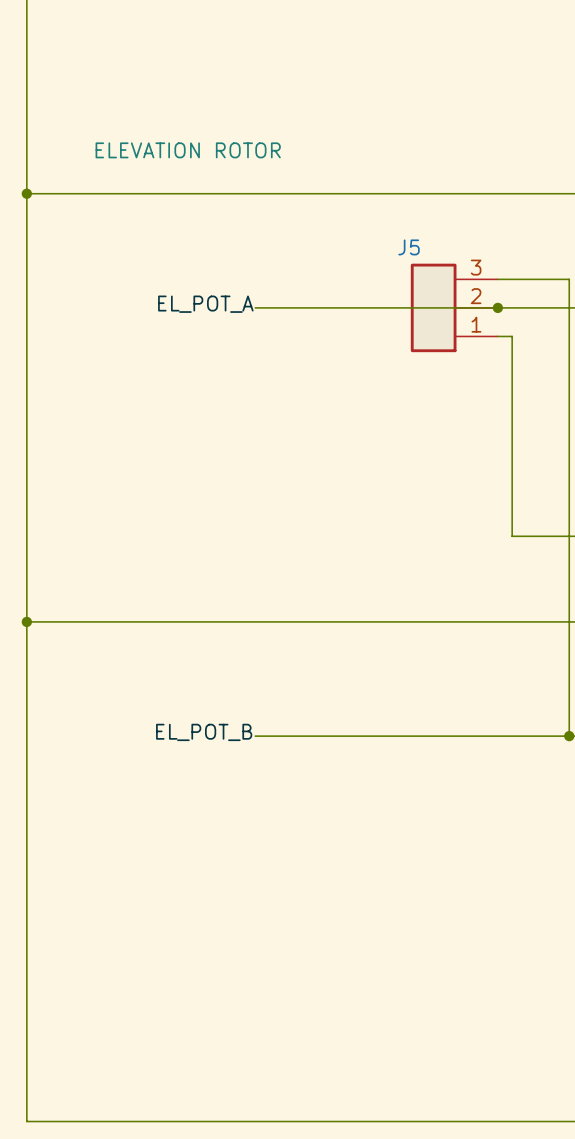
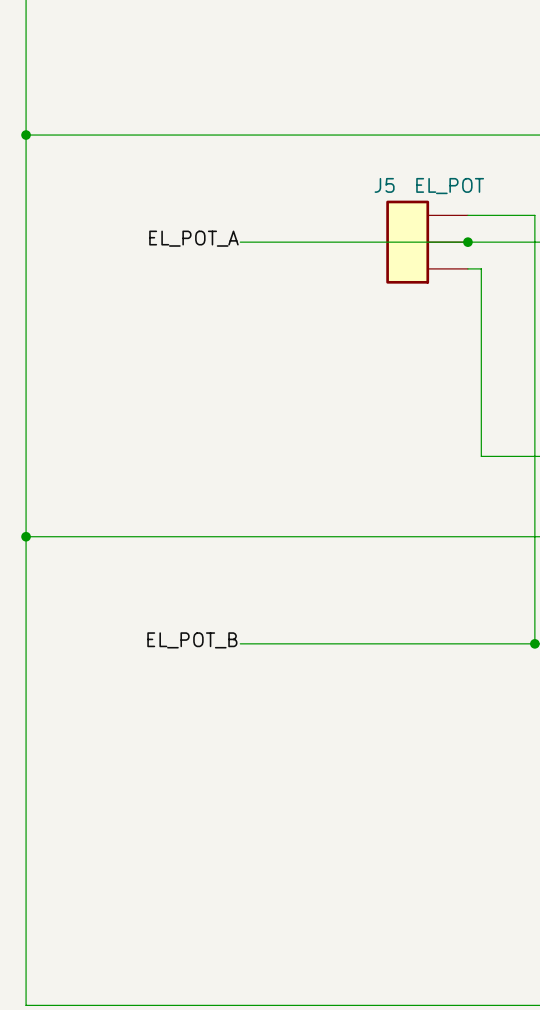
J5 value: ELEVATION ROTOR (188, 150) -> EL_POT (450, 186)
J5 pin number: 3 (476, 267) -> none
J5 pin number: 2 (476, 296) -> none
J5 pin number: 1 (476, 324) -> none

